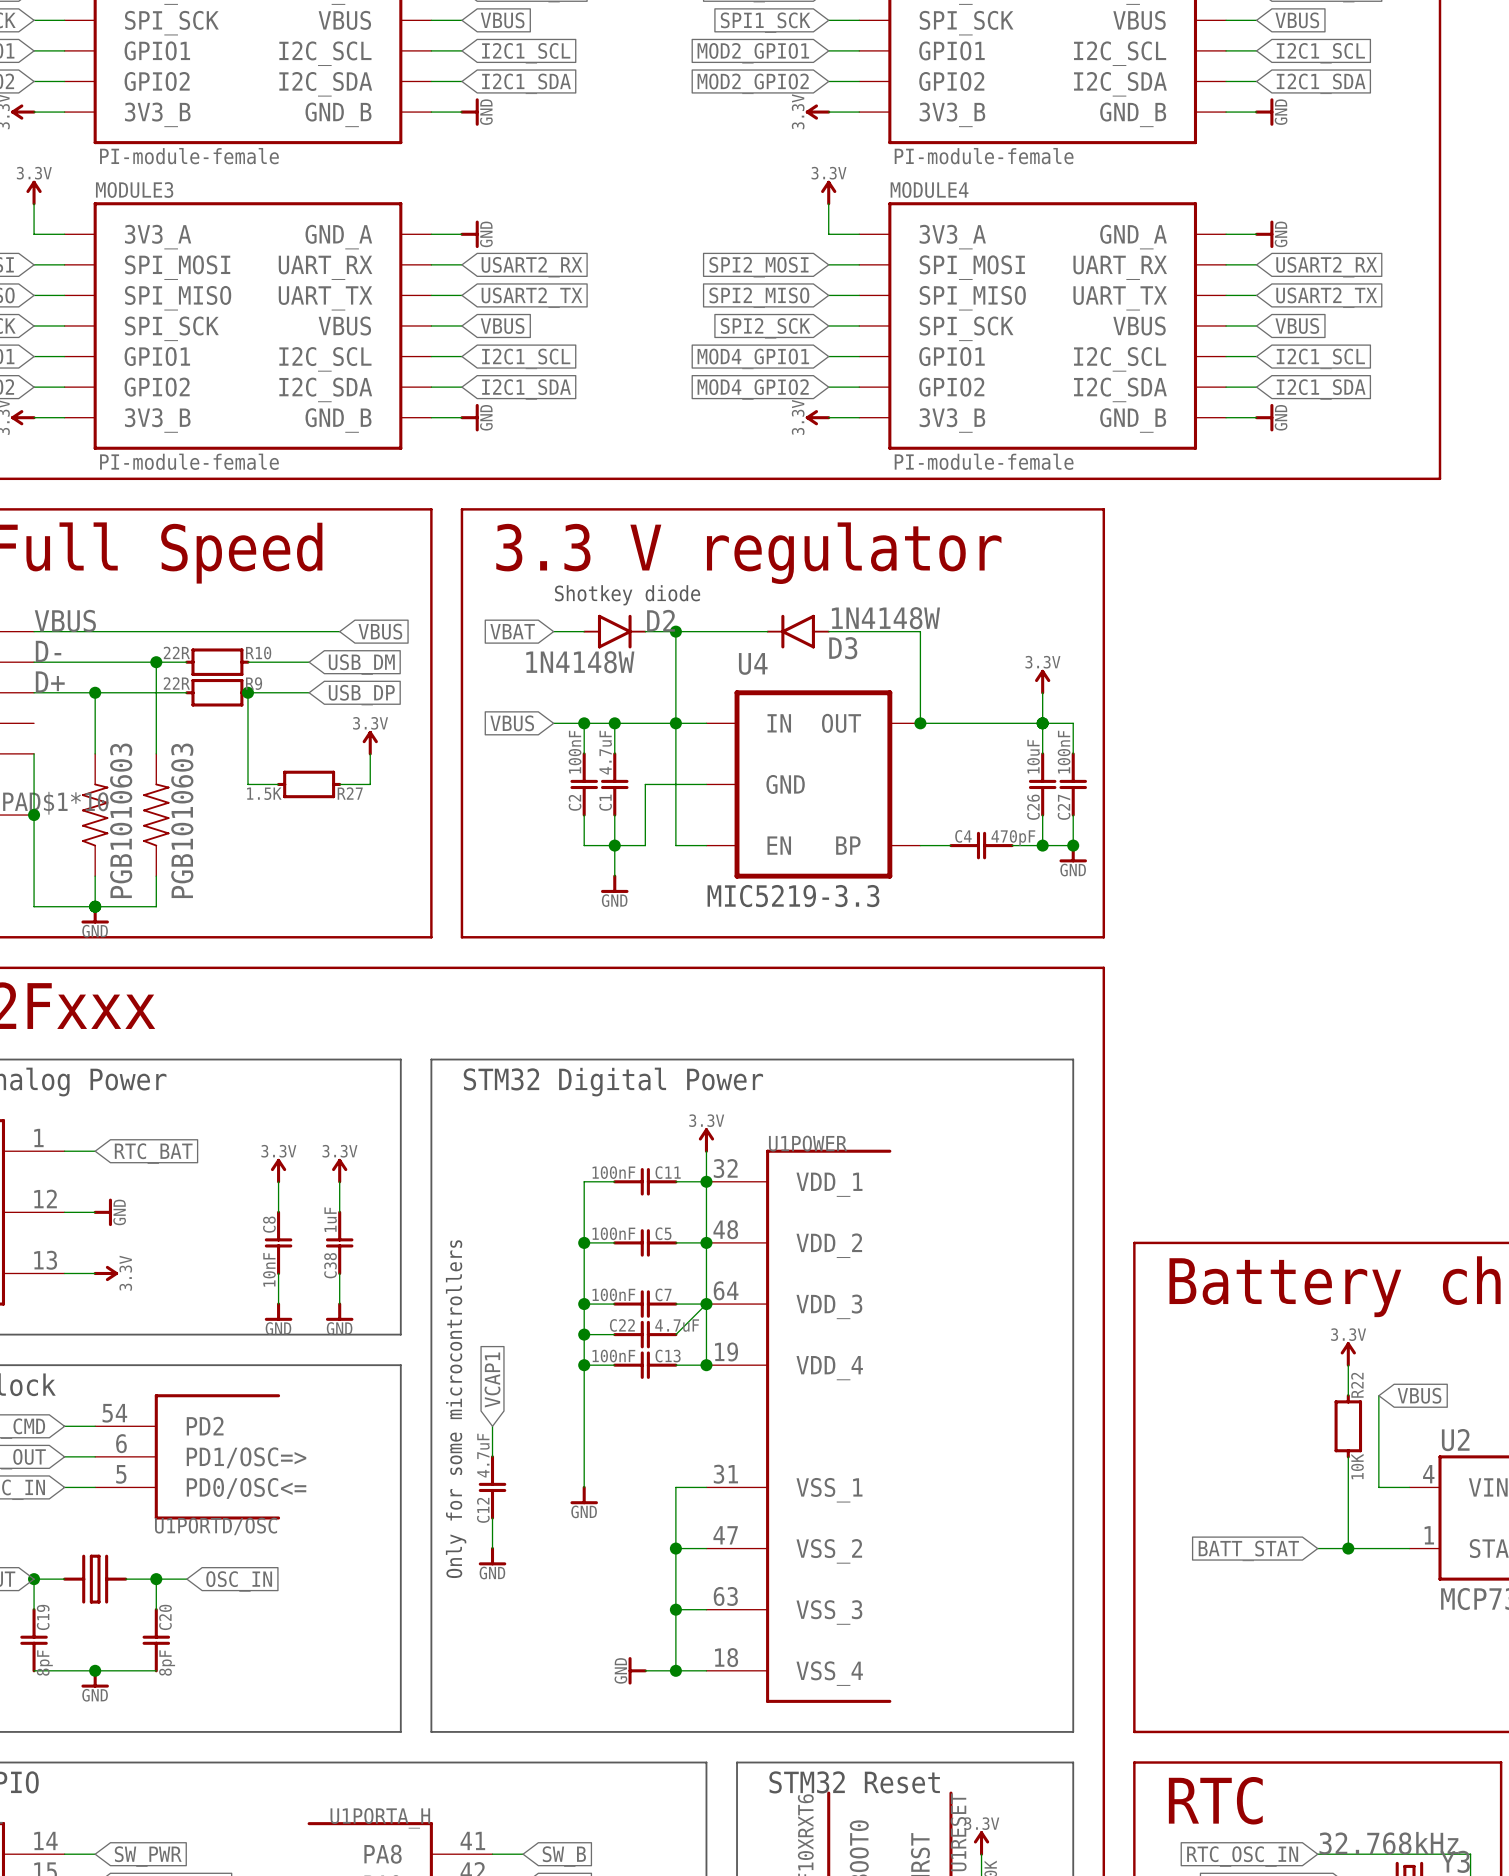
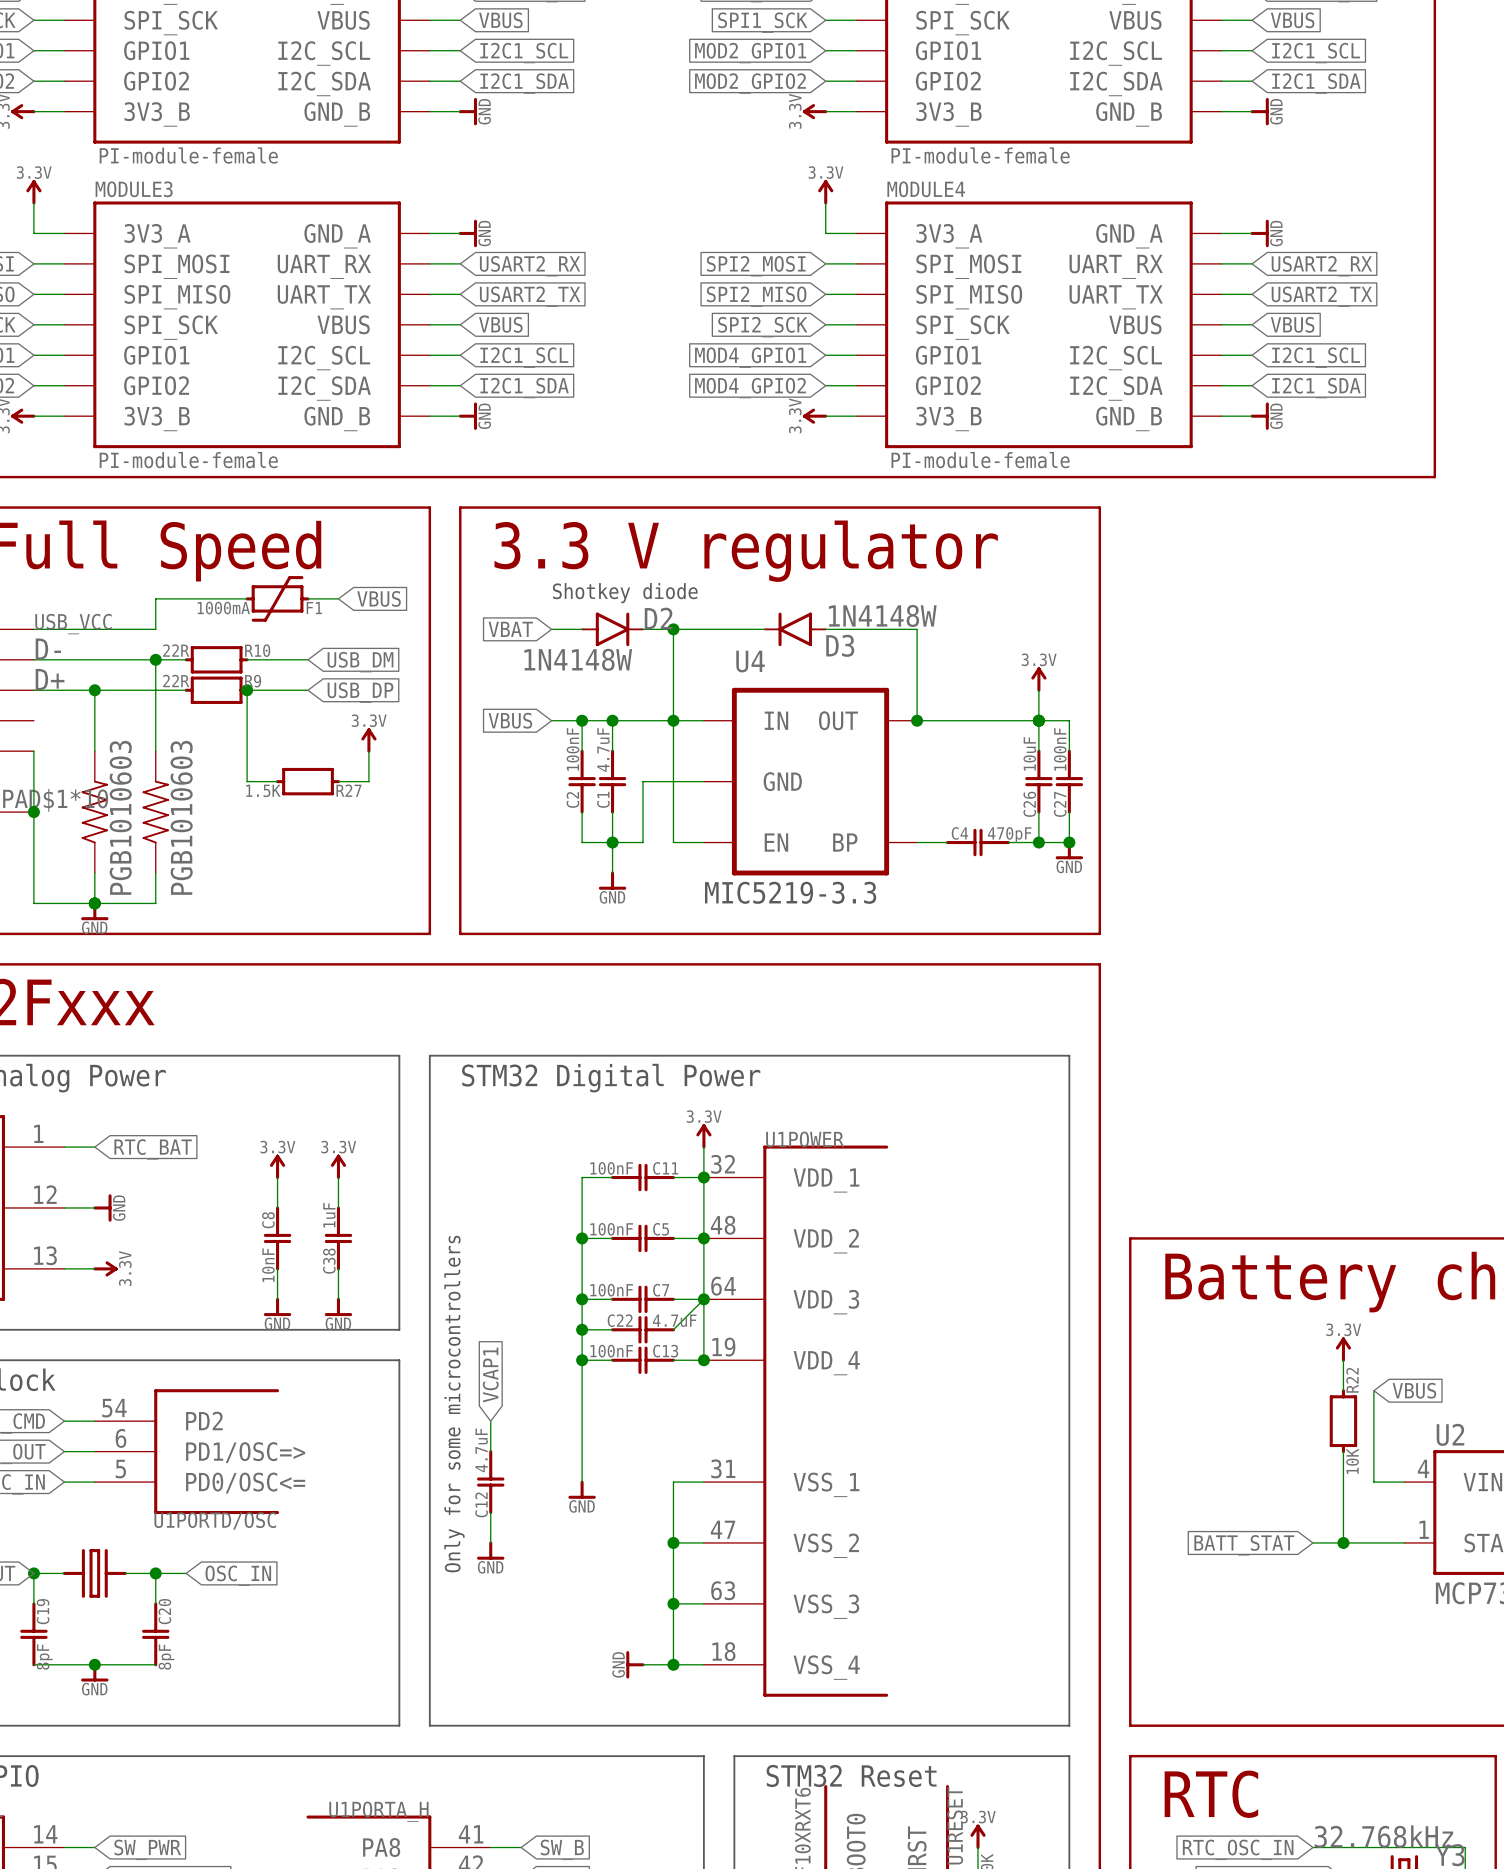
F1: none -> 1000mA (277, 598)
wire: none -> (308, 598) (338, 598)
label: VBUS (65, 620) -> USB_VCC (73, 624)
wire: (156, 631) (339, 631) -> (155, 629) (155, 598) (247, 598)
global label position: VBUS (380, 631) -> VBUS (379, 598)

